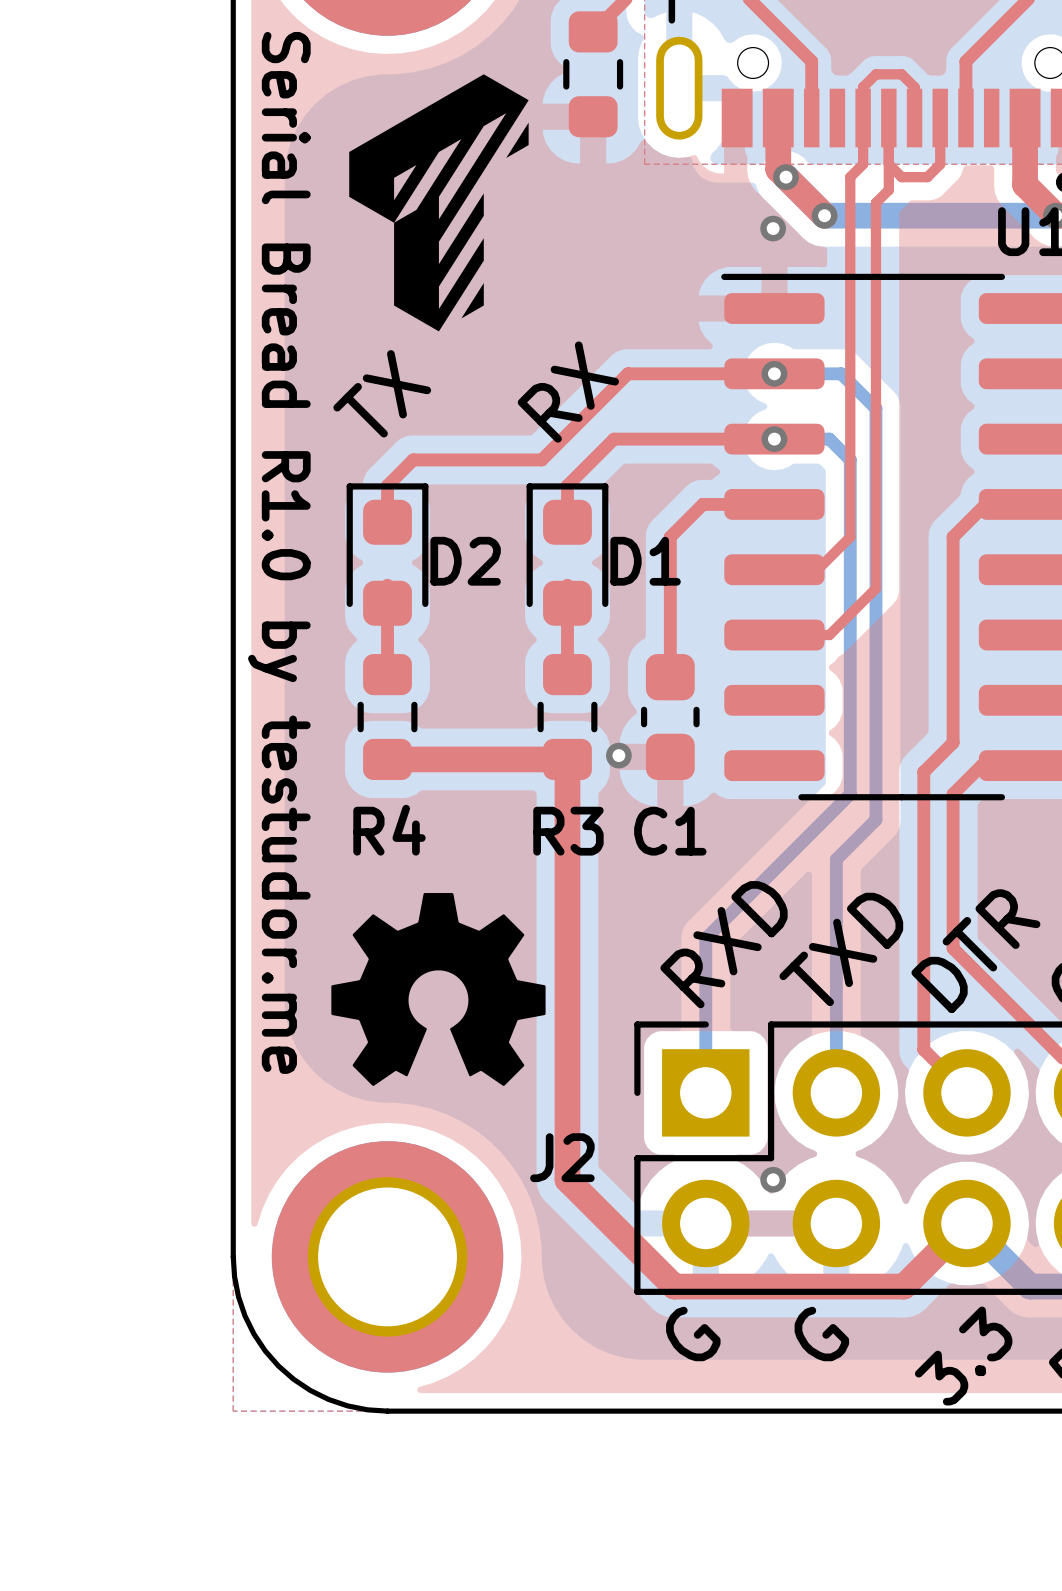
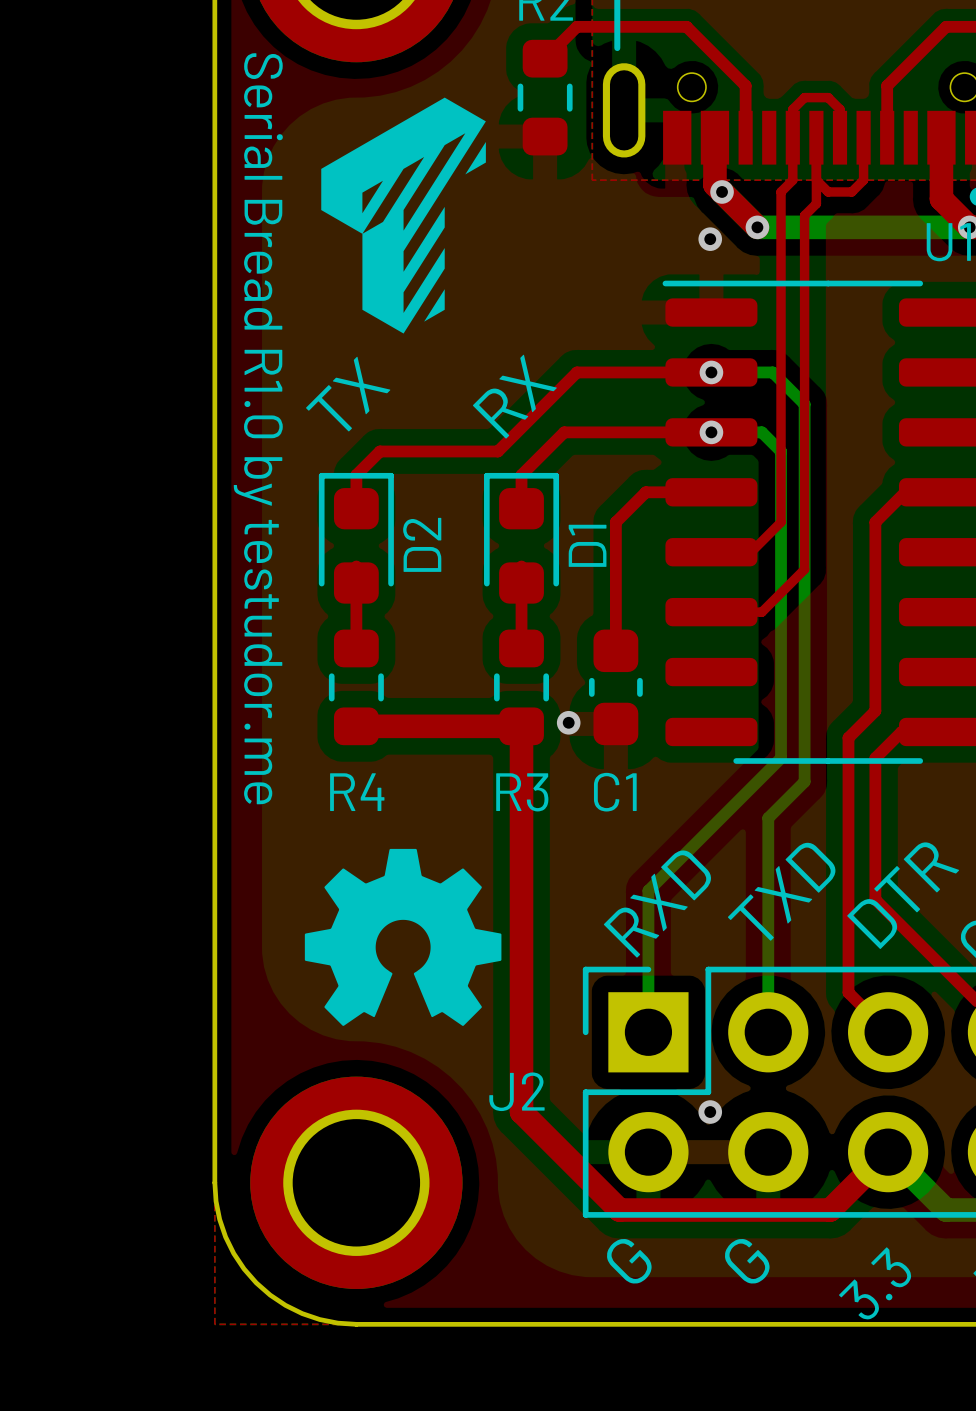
D2 name rotation: 0° (465, 561) -> 90° counterclockwise (422, 544)
D1 name rotation: 0° (645, 561) -> 90° counterclockwise (587, 545)

